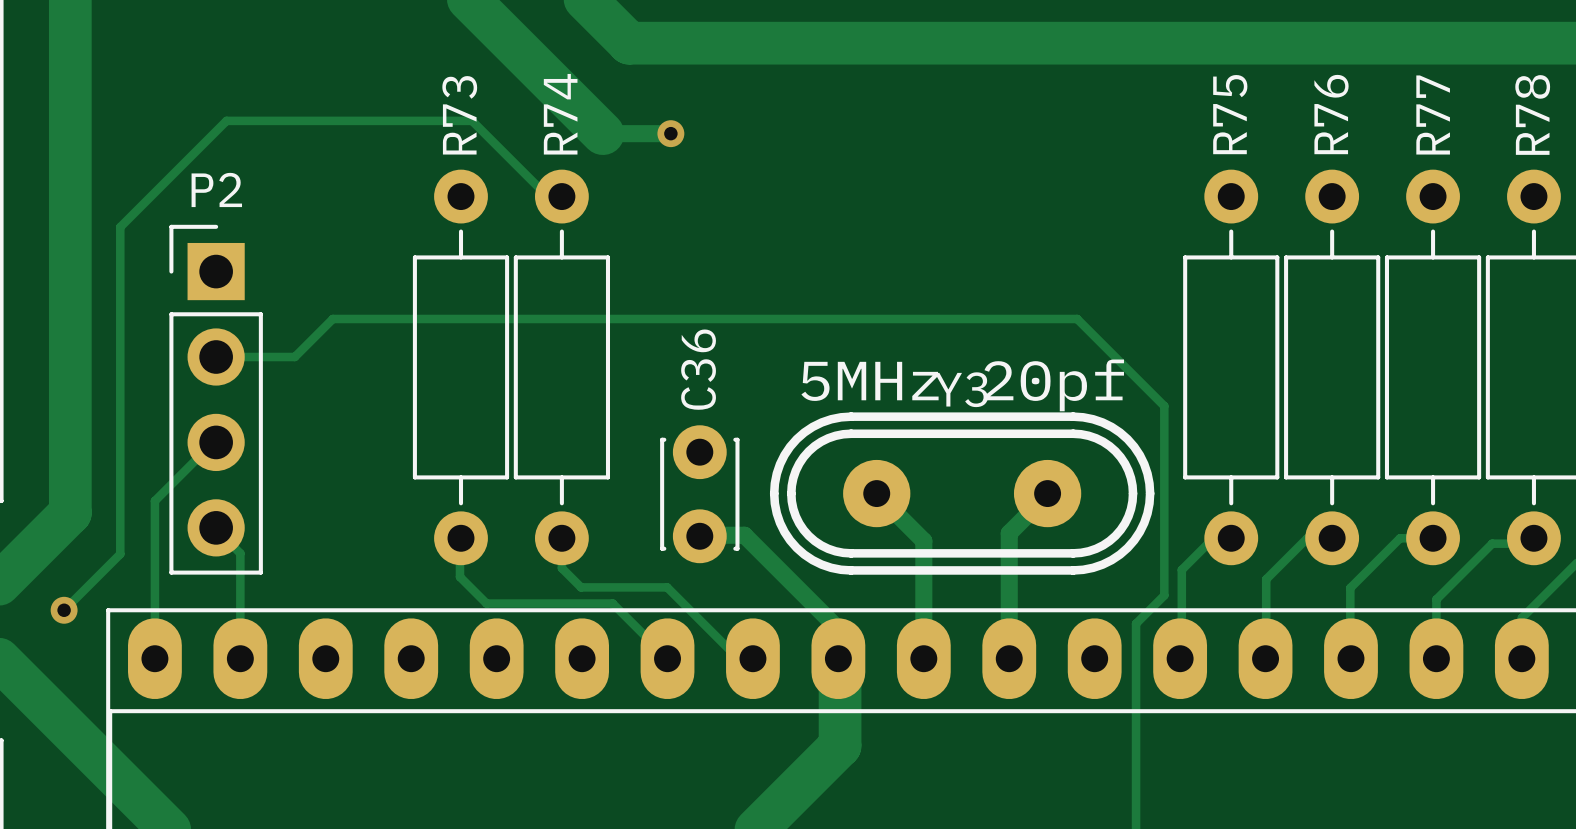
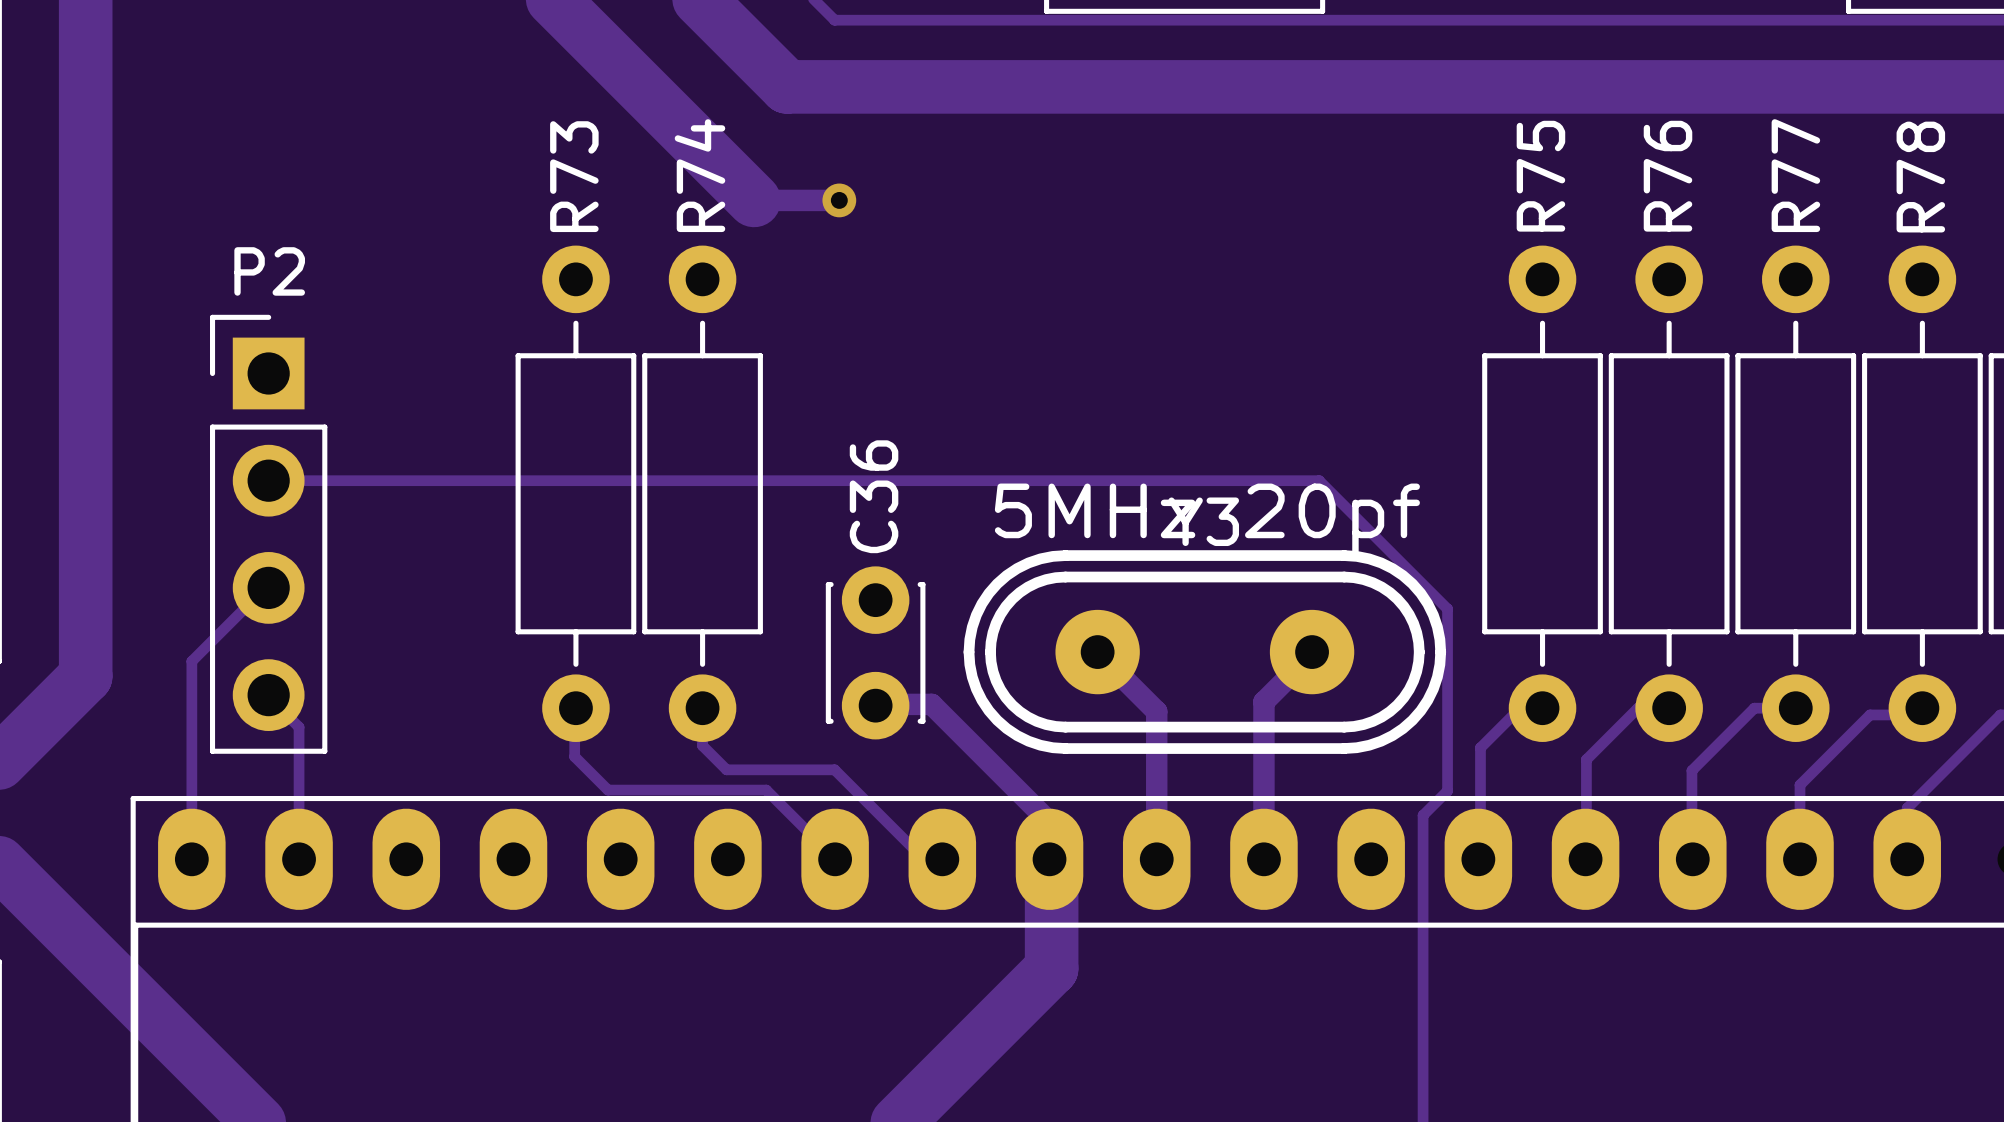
track: (561, 196) (547, 196) (472, 120) (226, 120) (120, 227) (120, 554) (64, 610) -> none
track: (294, 357) (332, 318) (1077, 318) (1164, 406) (1164, 595) (1155, 604) -> (367, 480) (1319, 480) (1447, 609) (1447, 790)
via: (64, 610) -> none

